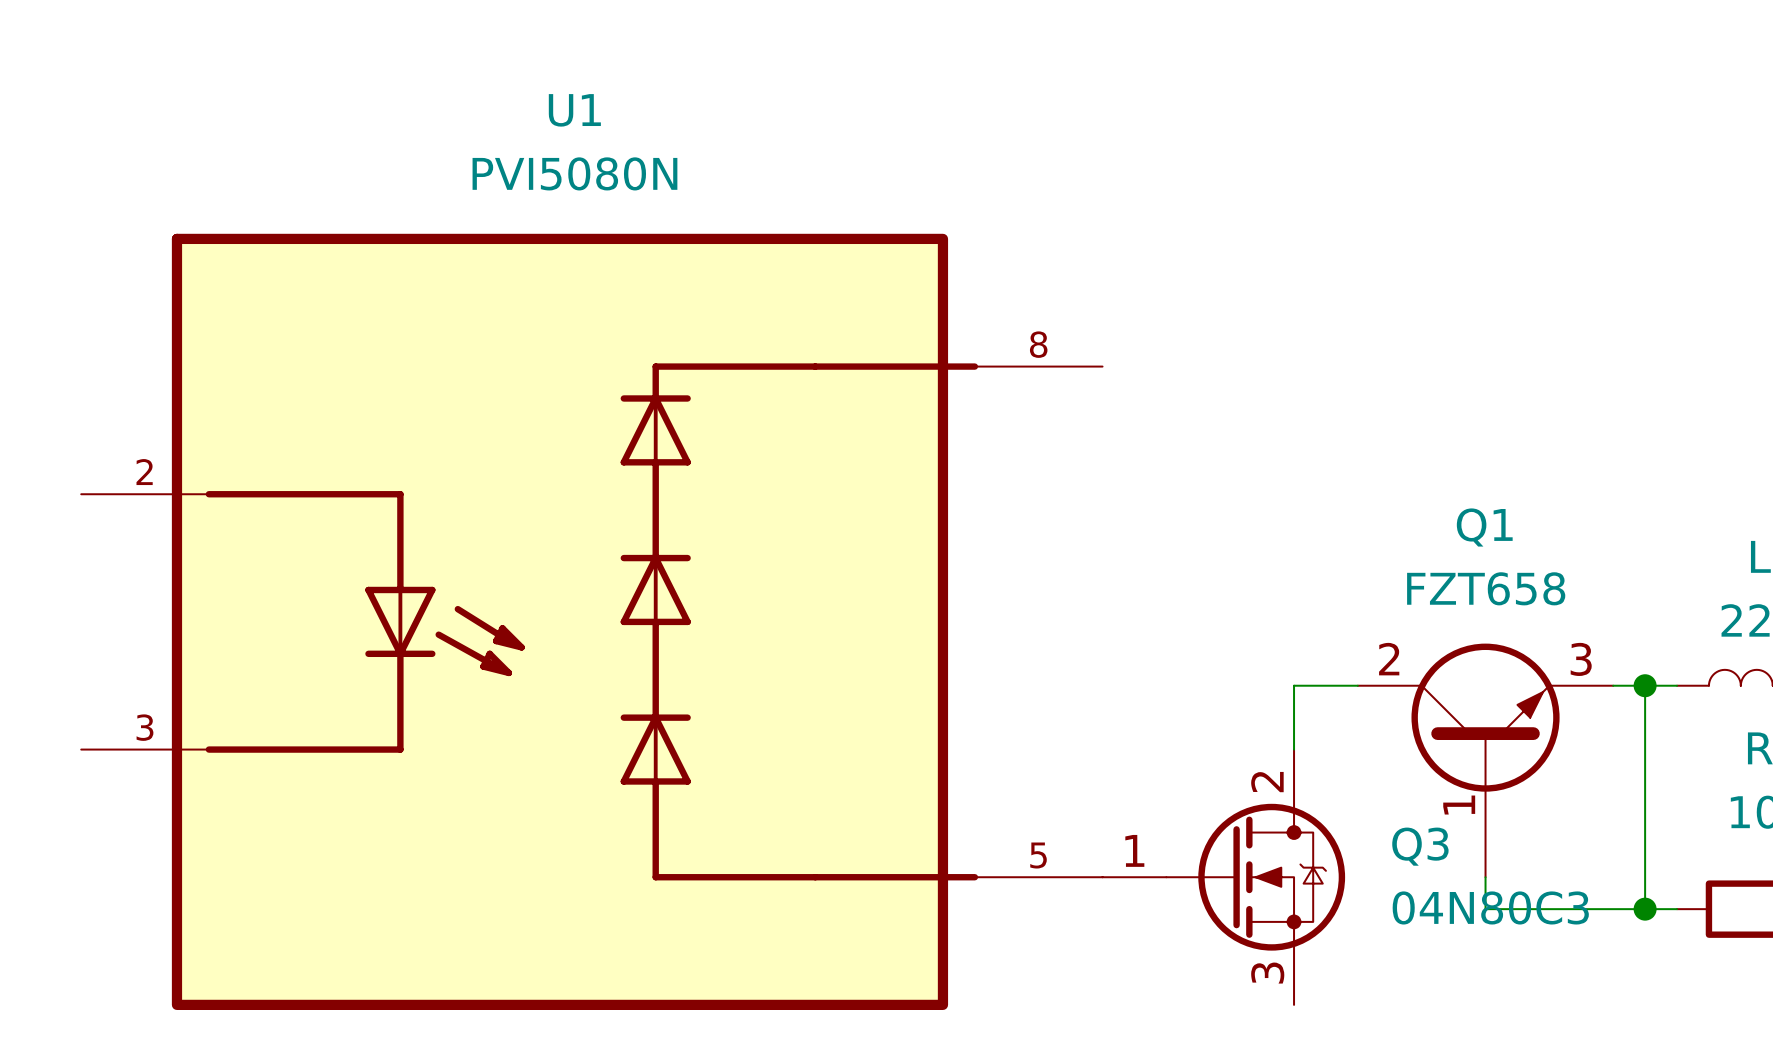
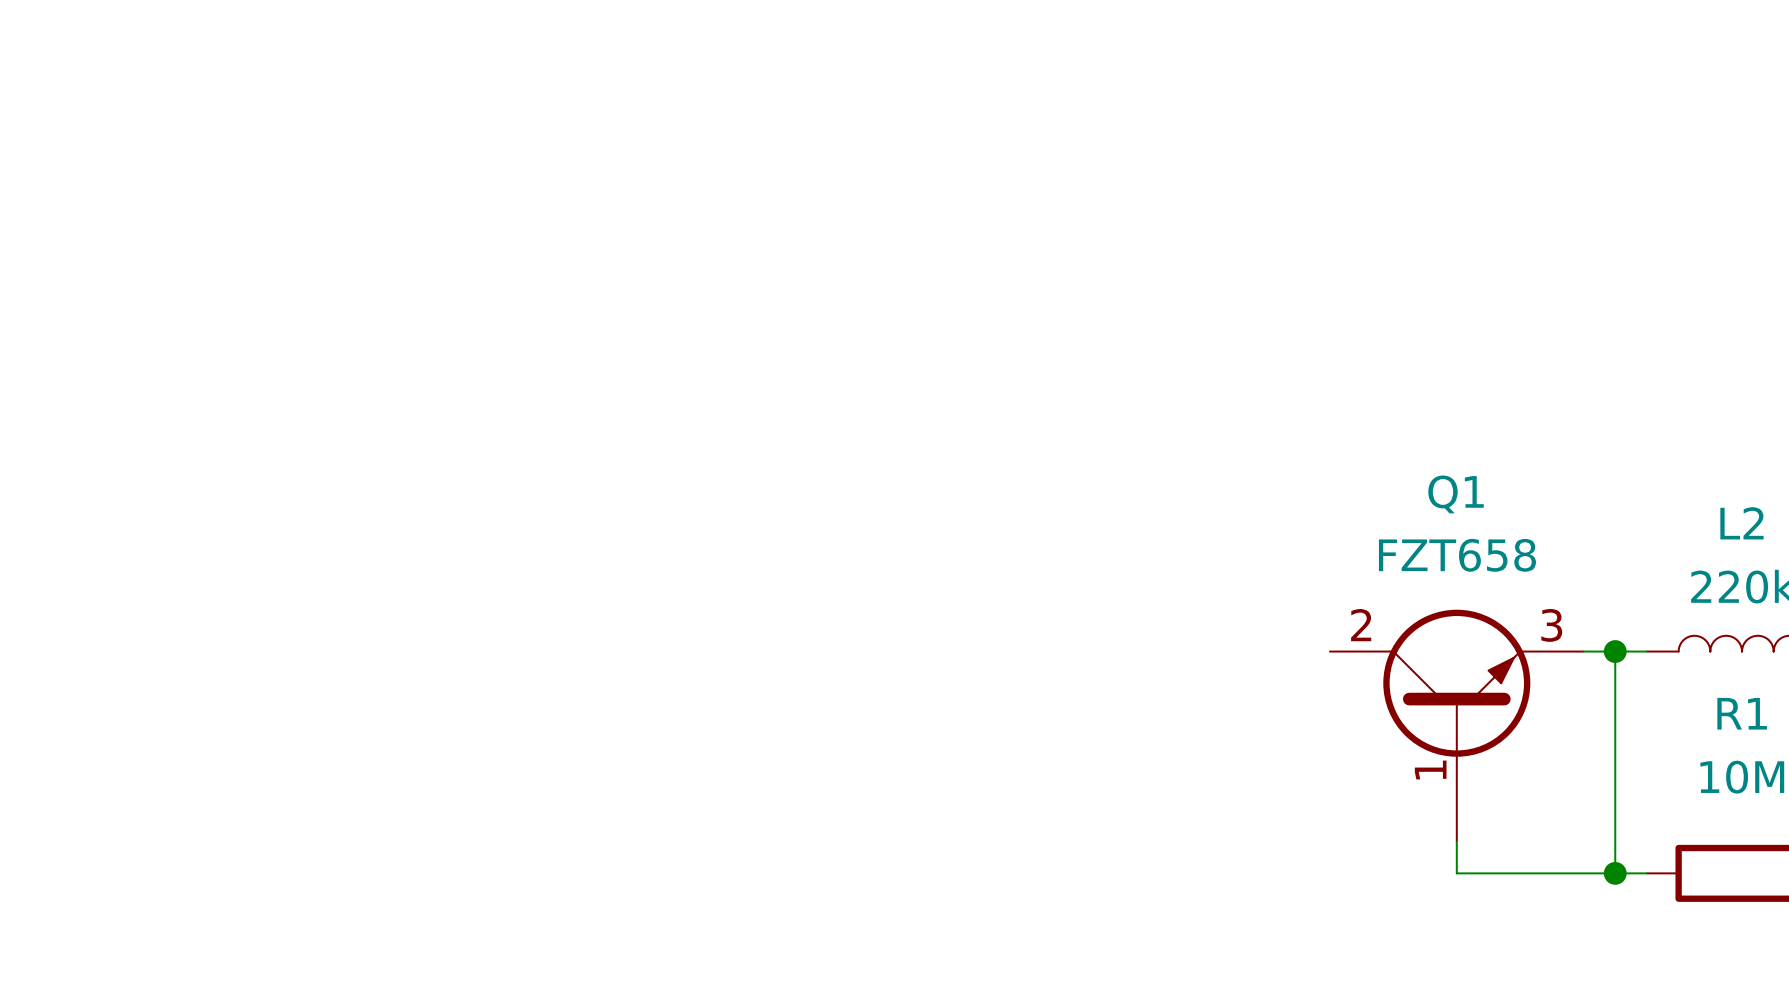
U1: PVI5080N (591, 621) -> none
wire: (1357, 685) (1294, 685) (1294, 749) -> none
Q3: 04N80C3 (1223, 877) -> none

